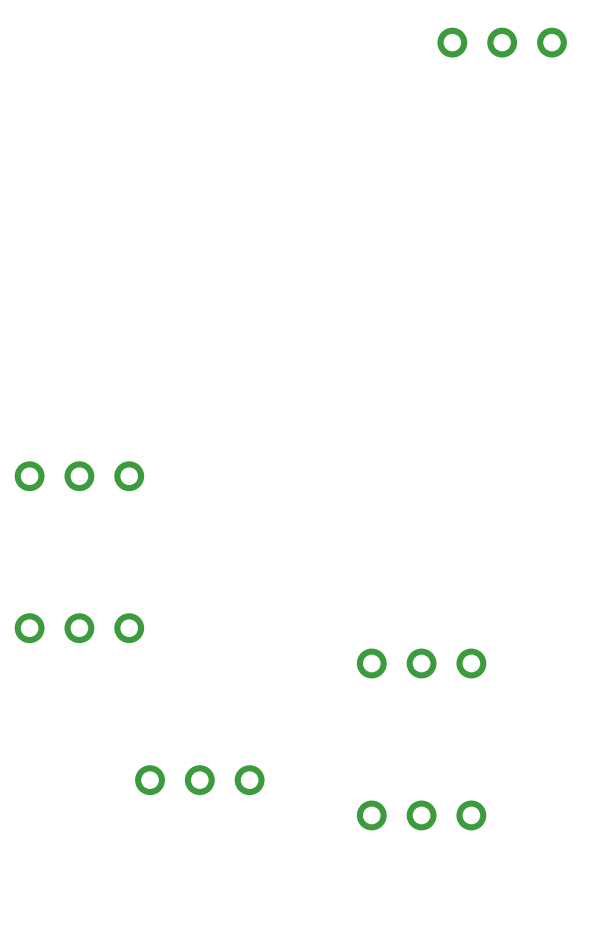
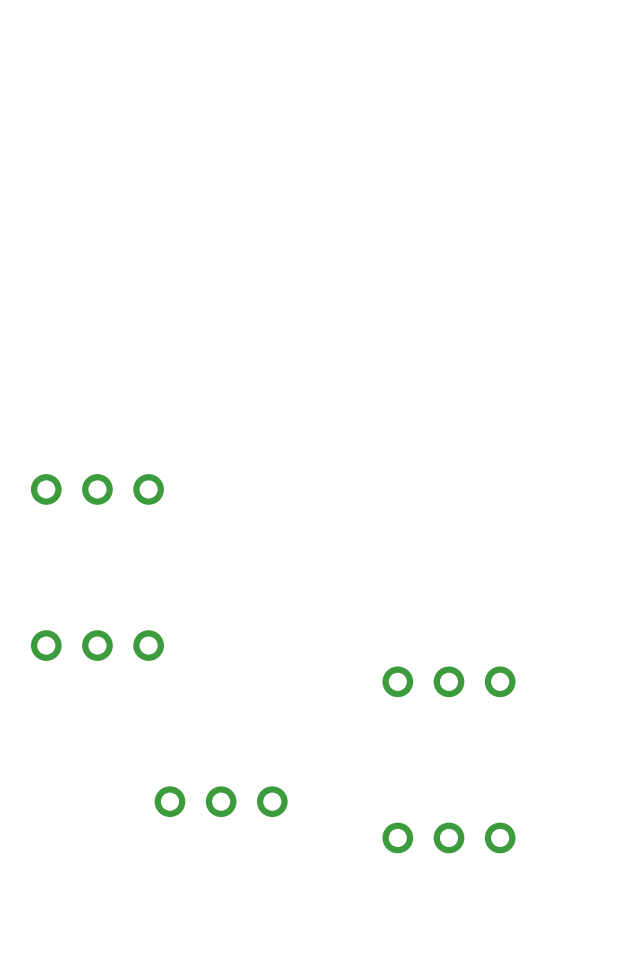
part: (502, 42) -> none

